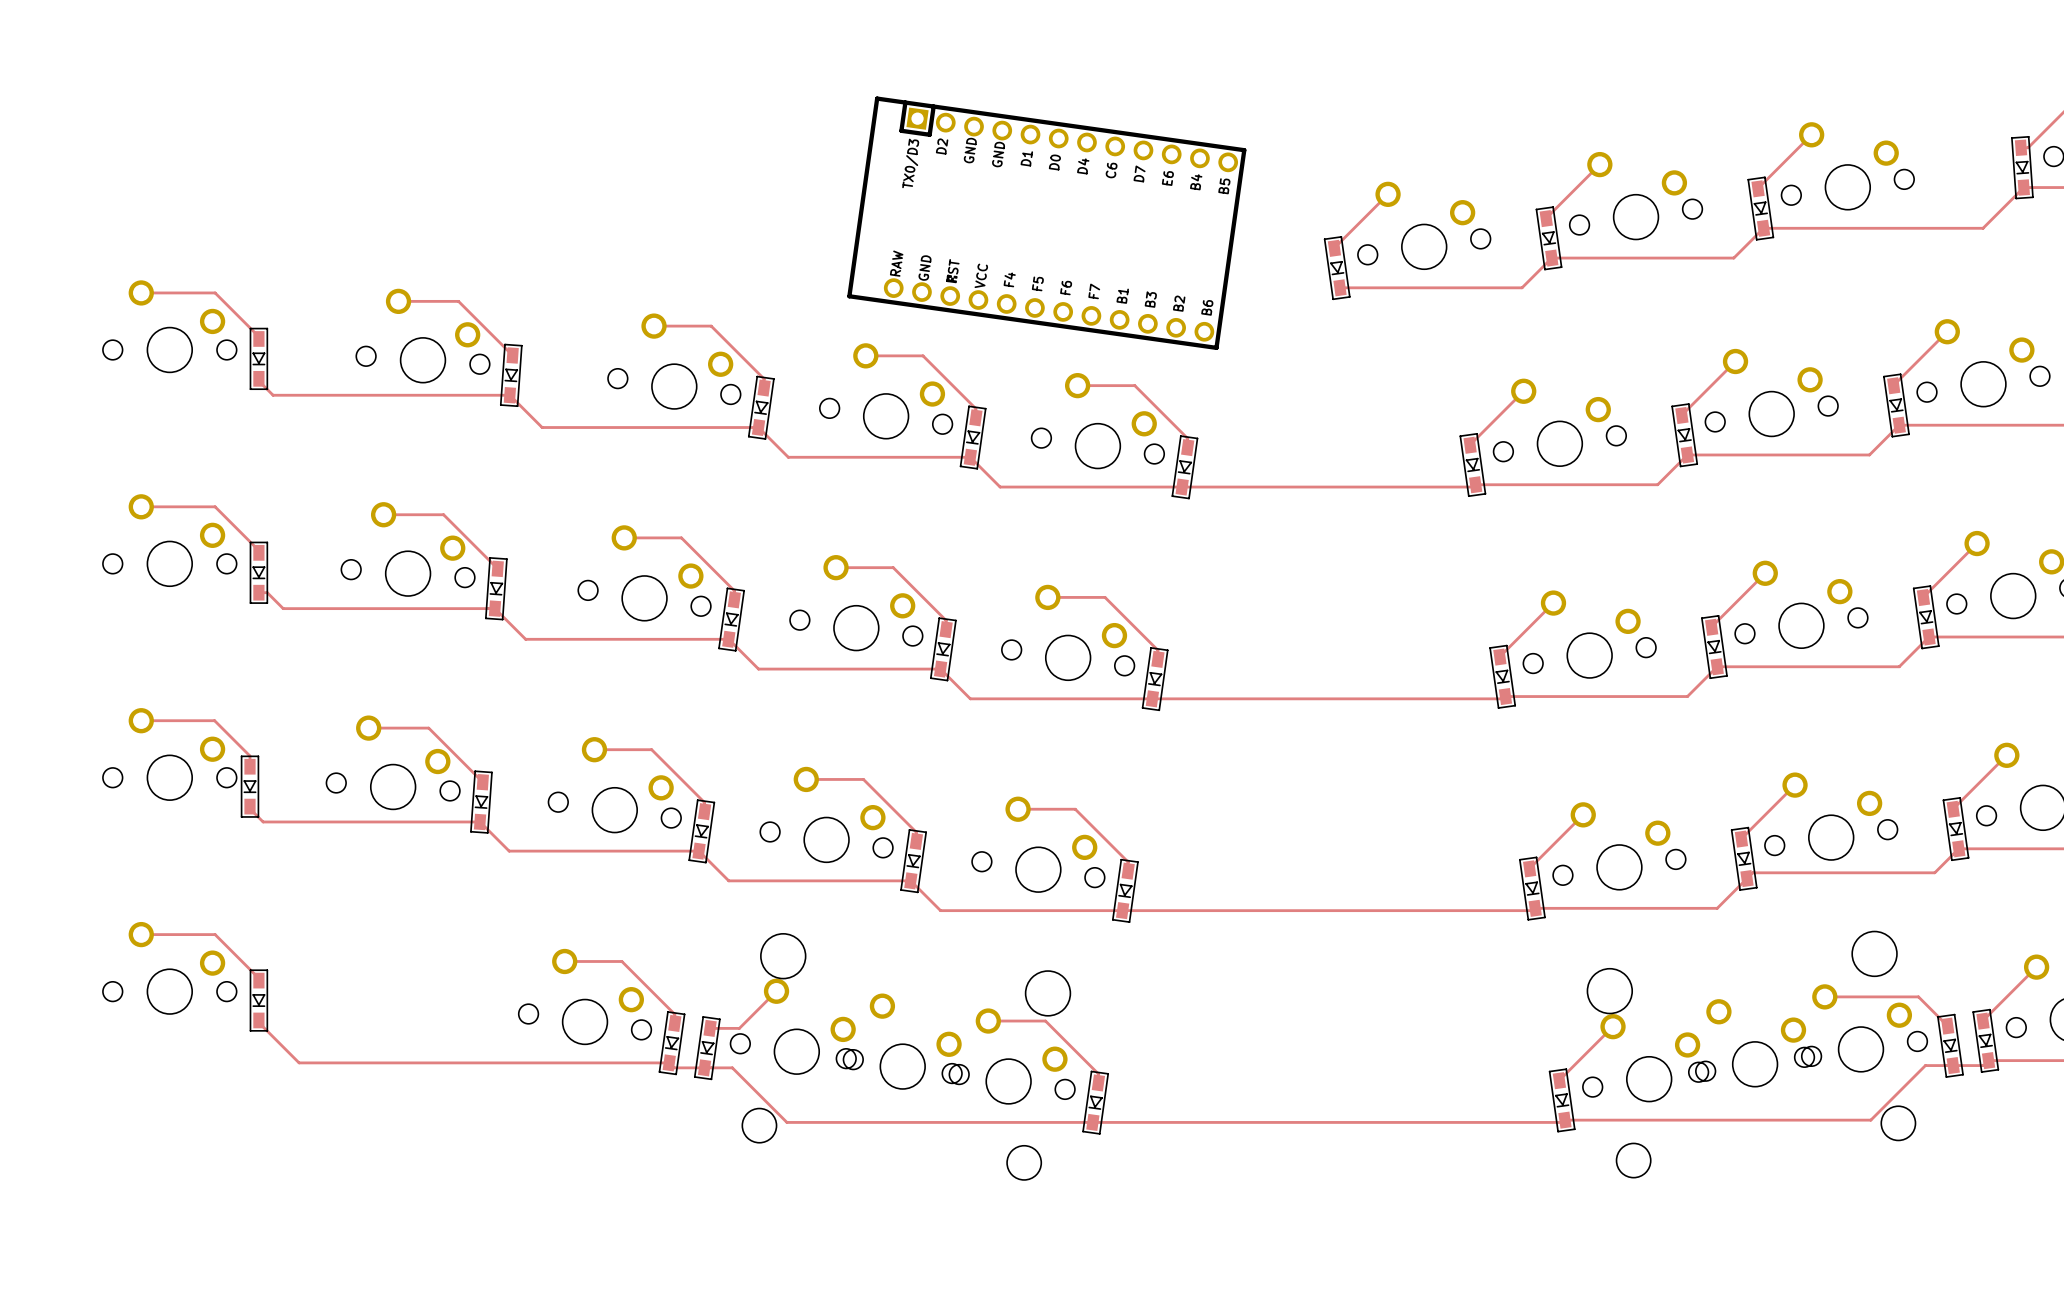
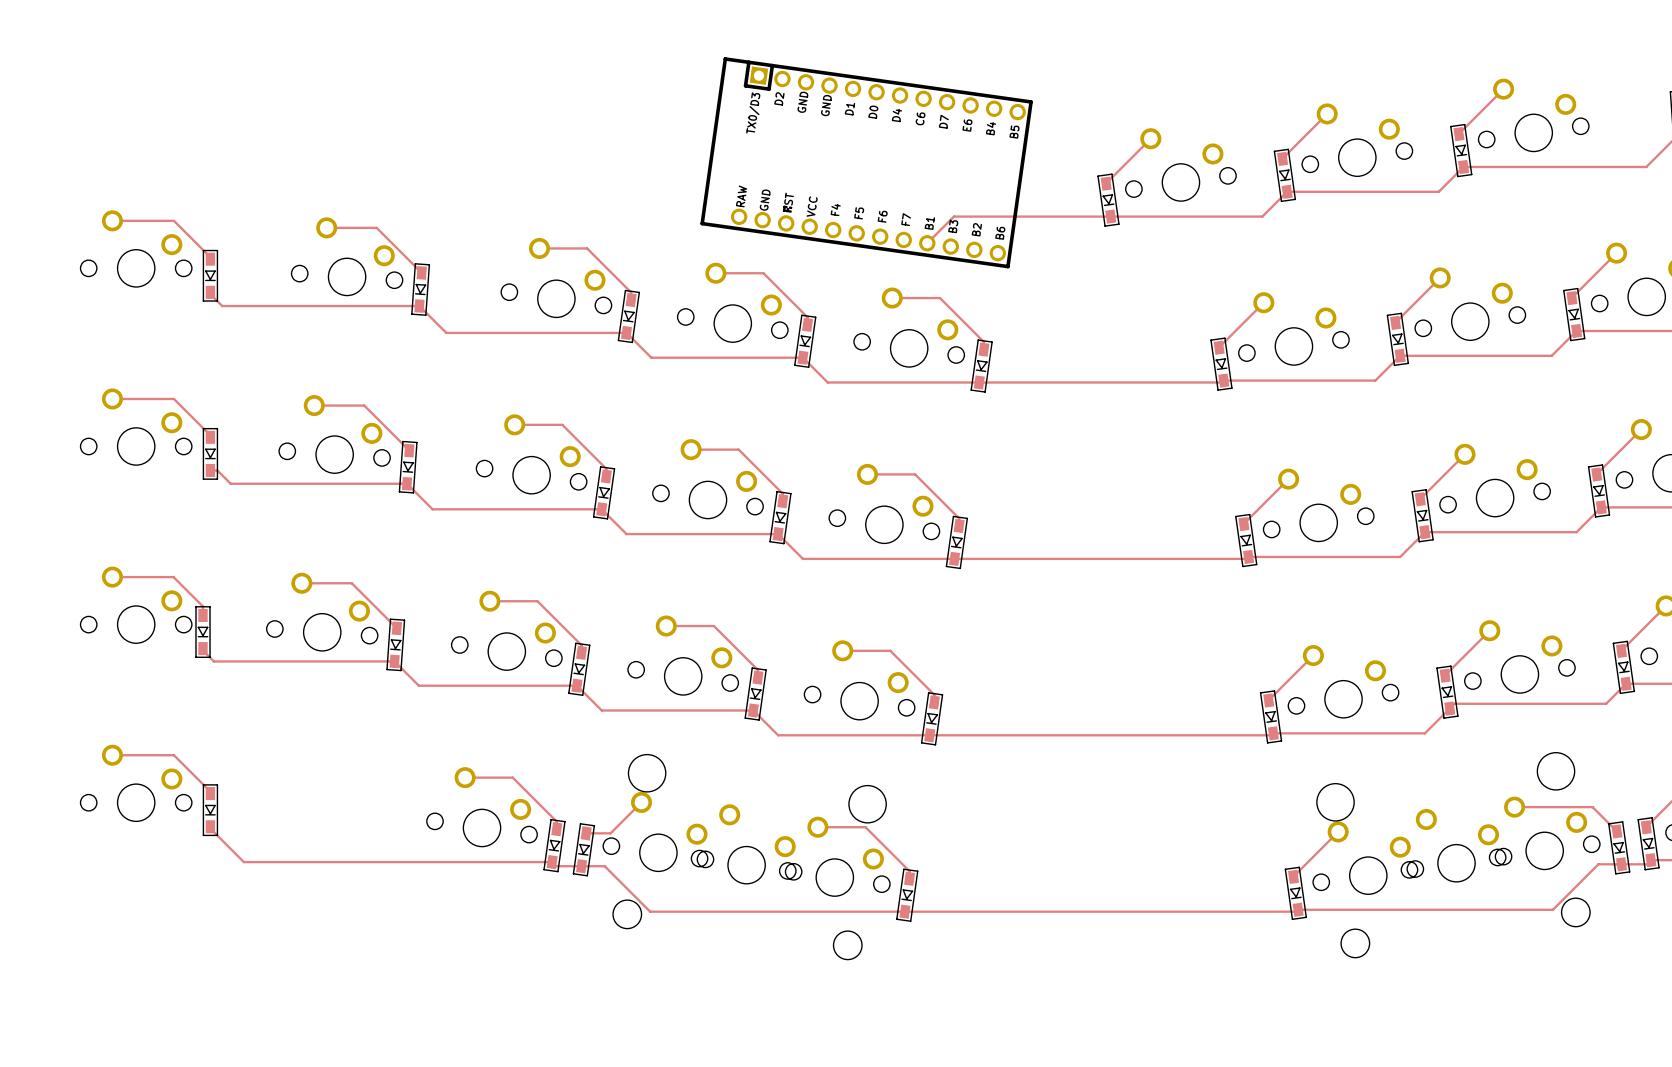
track: none -> (1110, 216) (953, 216) (927, 243)

